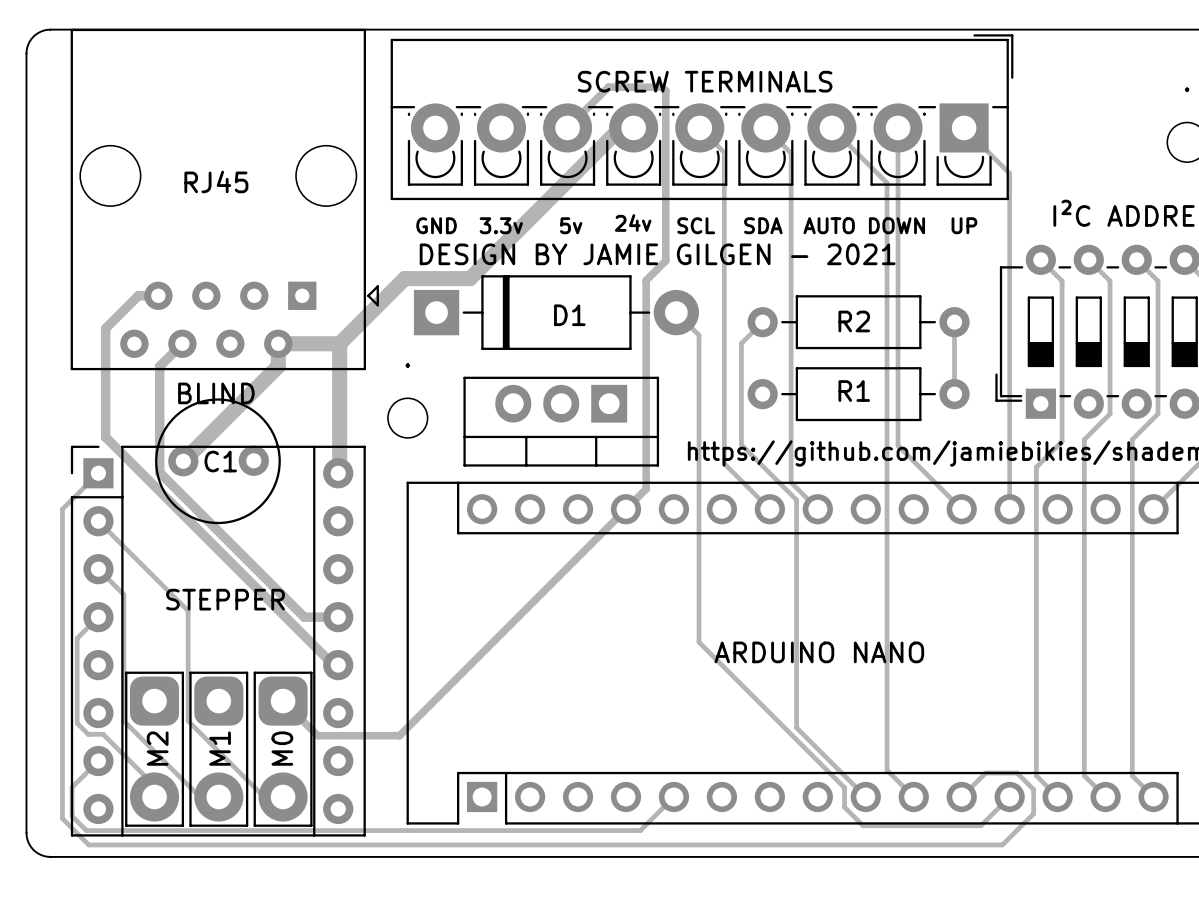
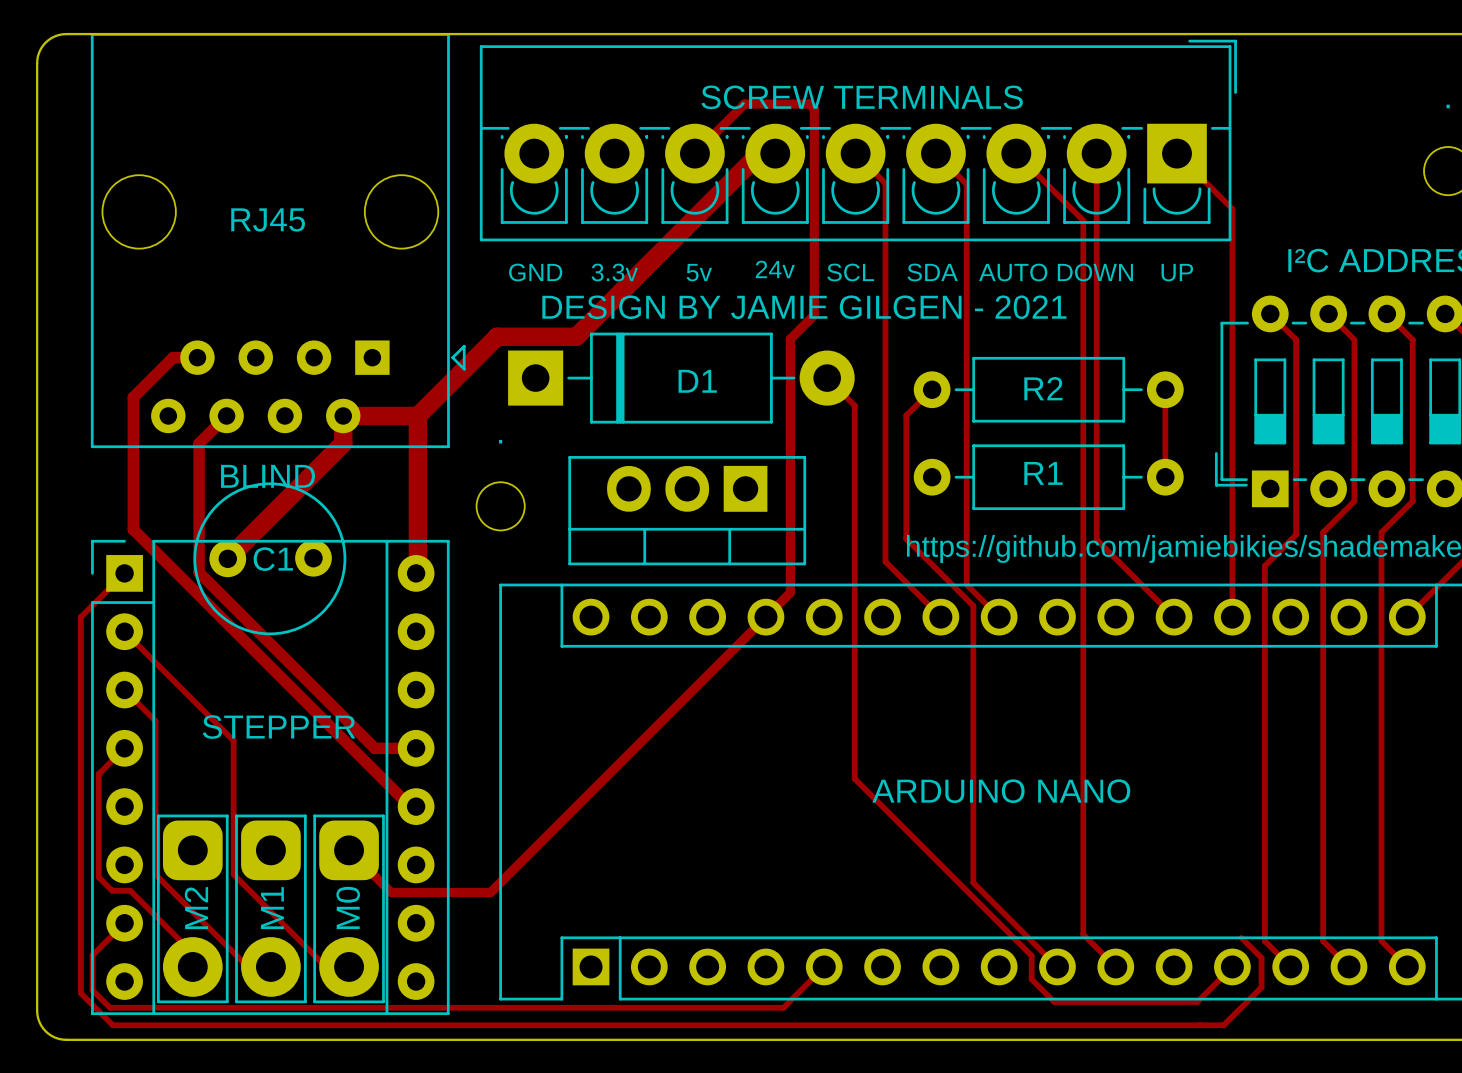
track: (1017, 773) (985, 773) (961, 796) -> none

